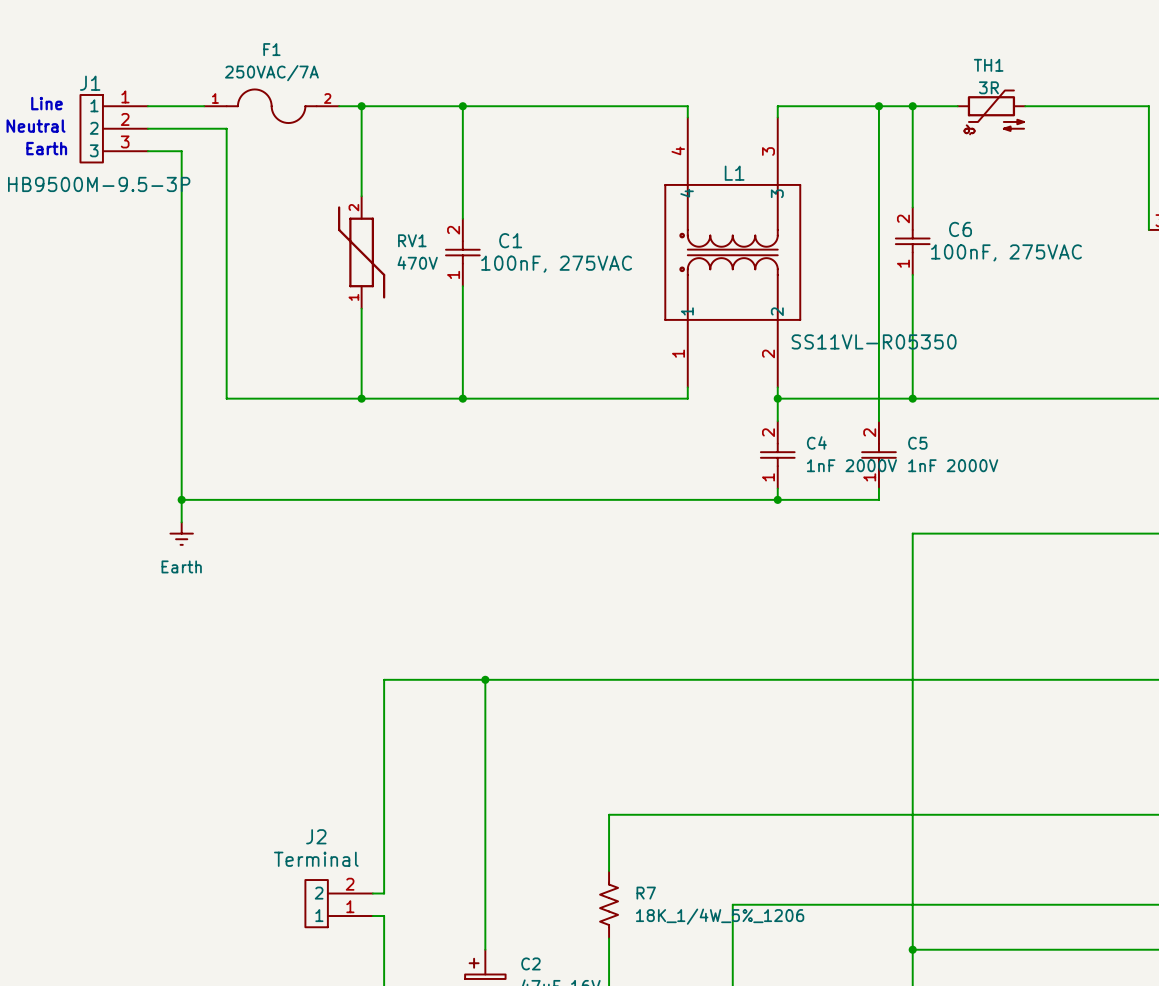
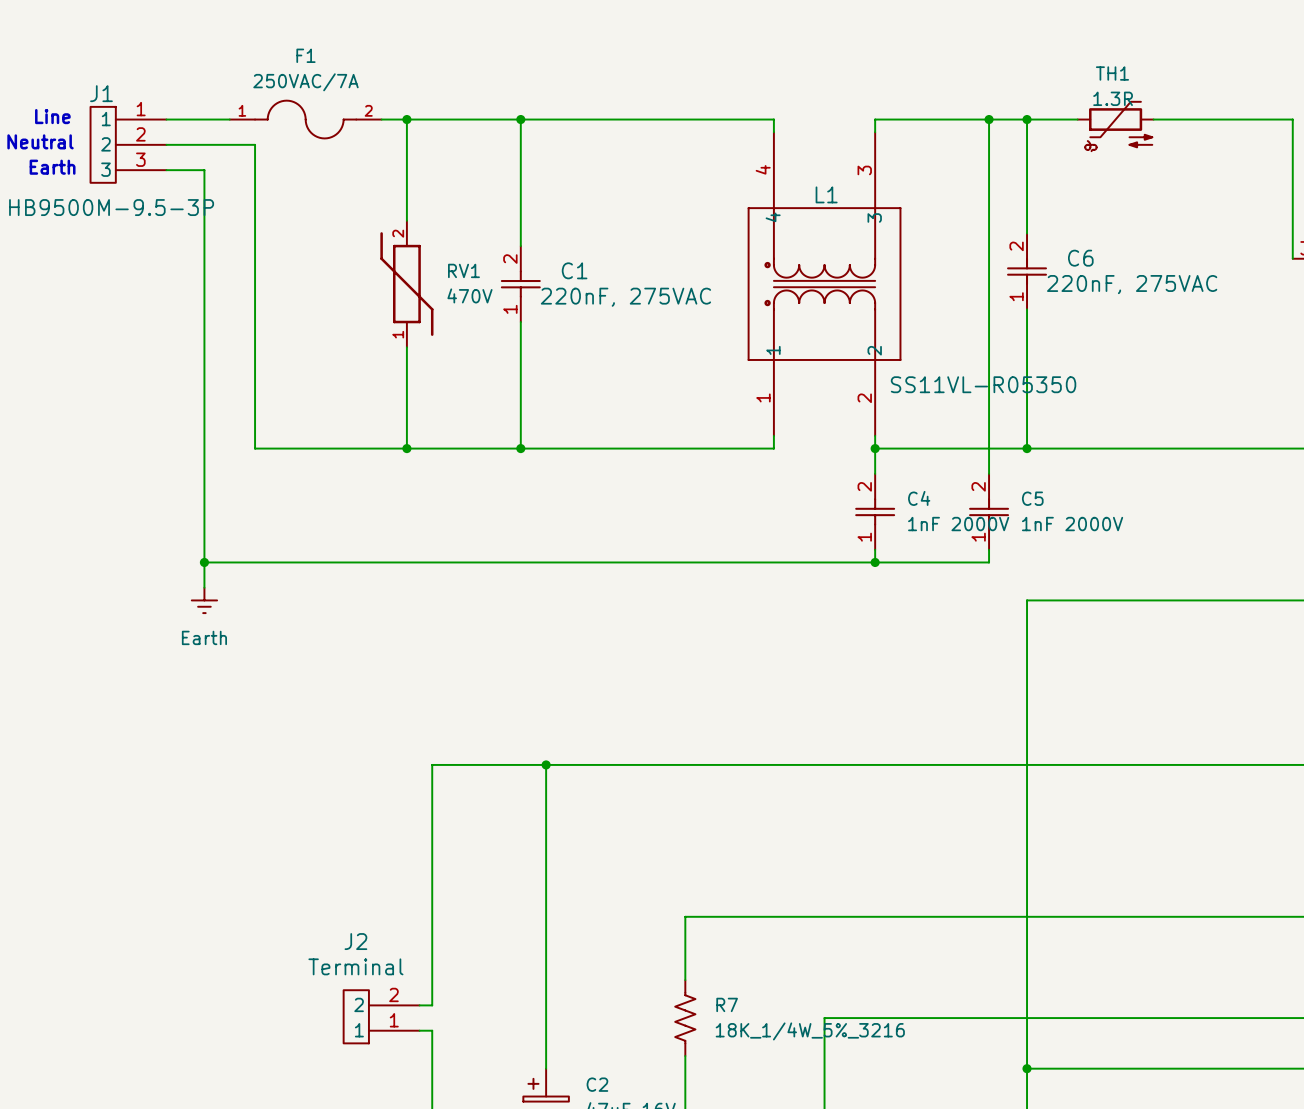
TH1 value: 3R (988, 87) -> 1.3R (1113, 98)
C6 value: 100nF, 275VAC (1006, 252) -> 220nF, 275VAC (1132, 284)
C1 value: 100nF, 275VAC (556, 264) -> 220nF, 275VAC (625, 297)
R7 value: 18K_1/4W_5%_1206 (720, 916) -> 18K_1/4W_5%_3216 (810, 1031)

